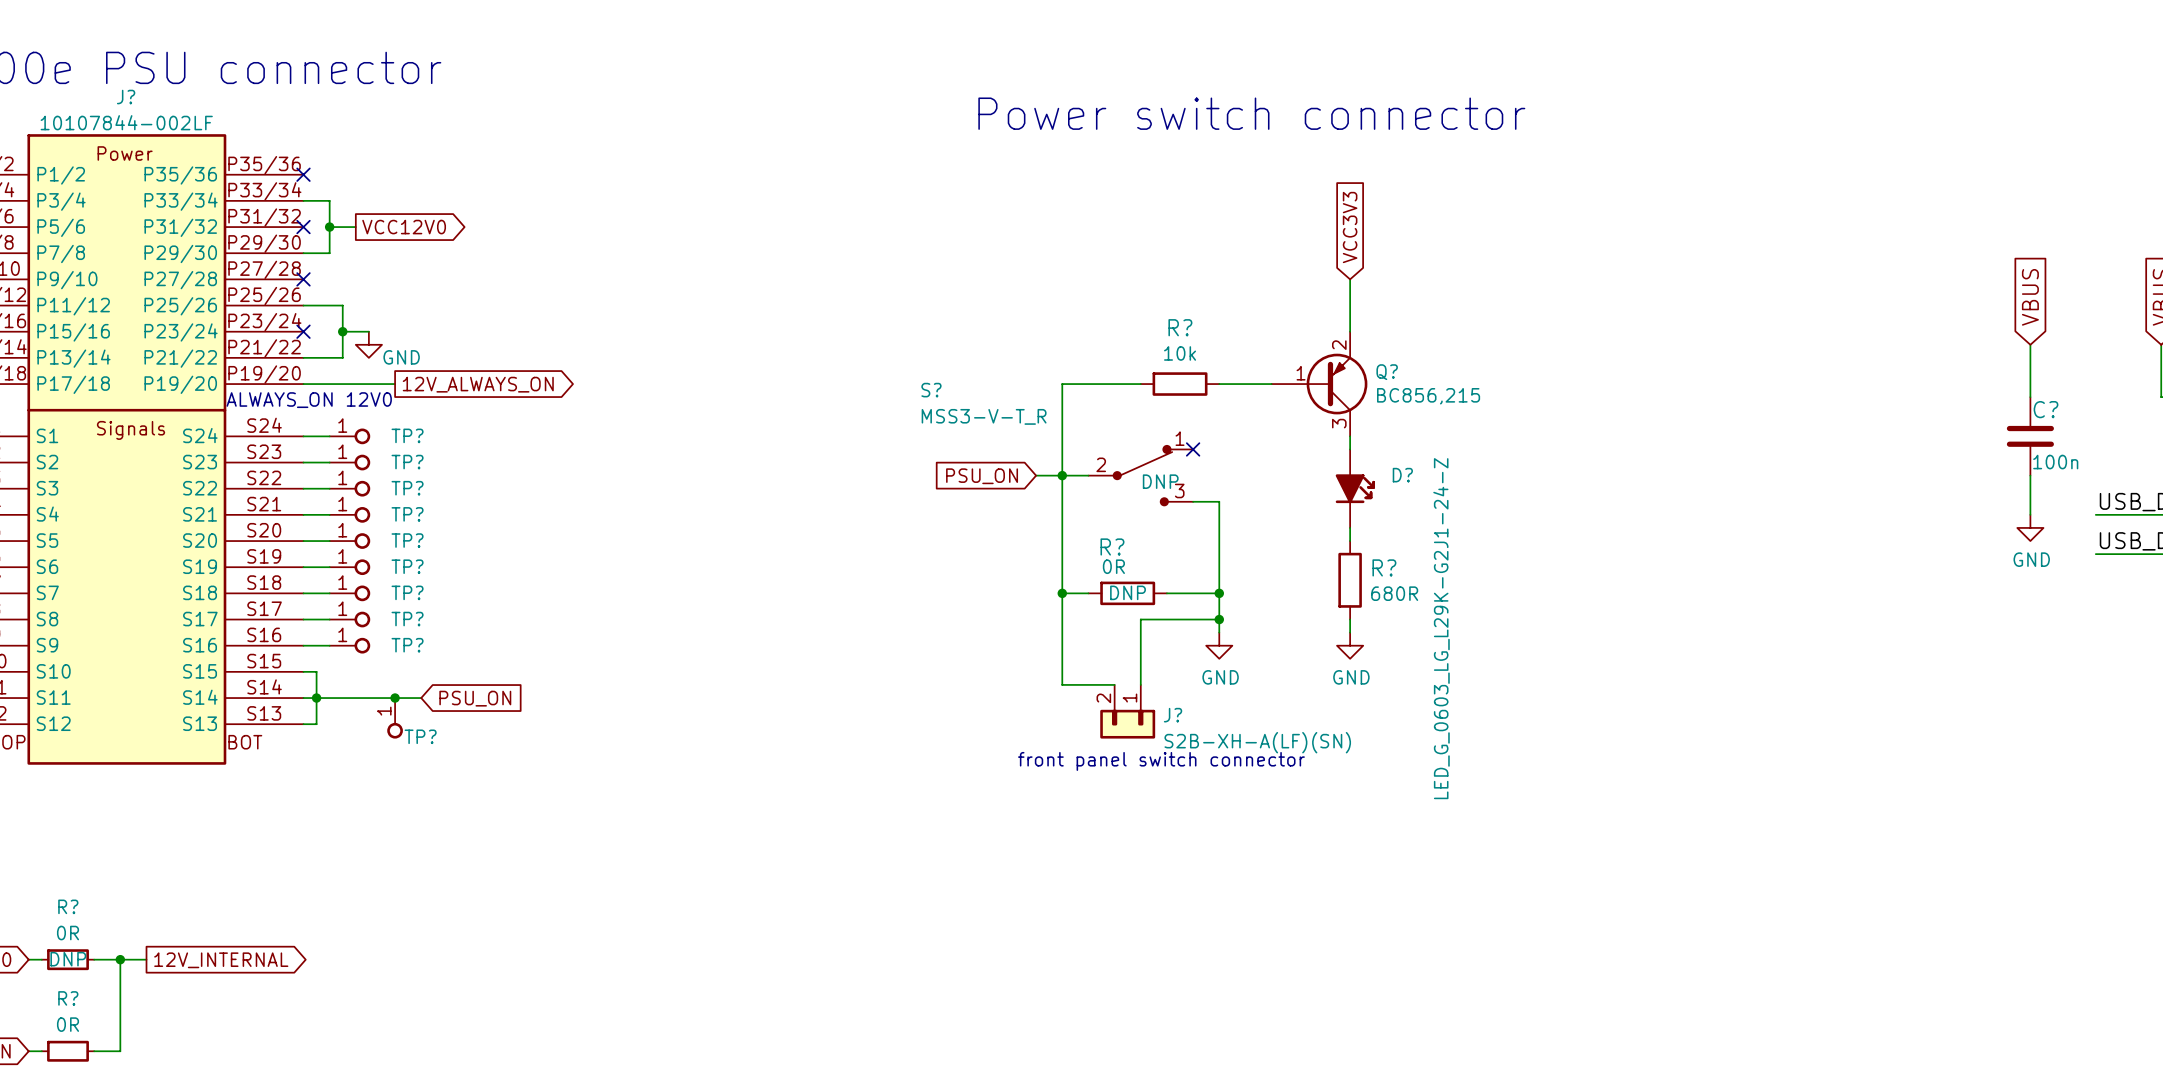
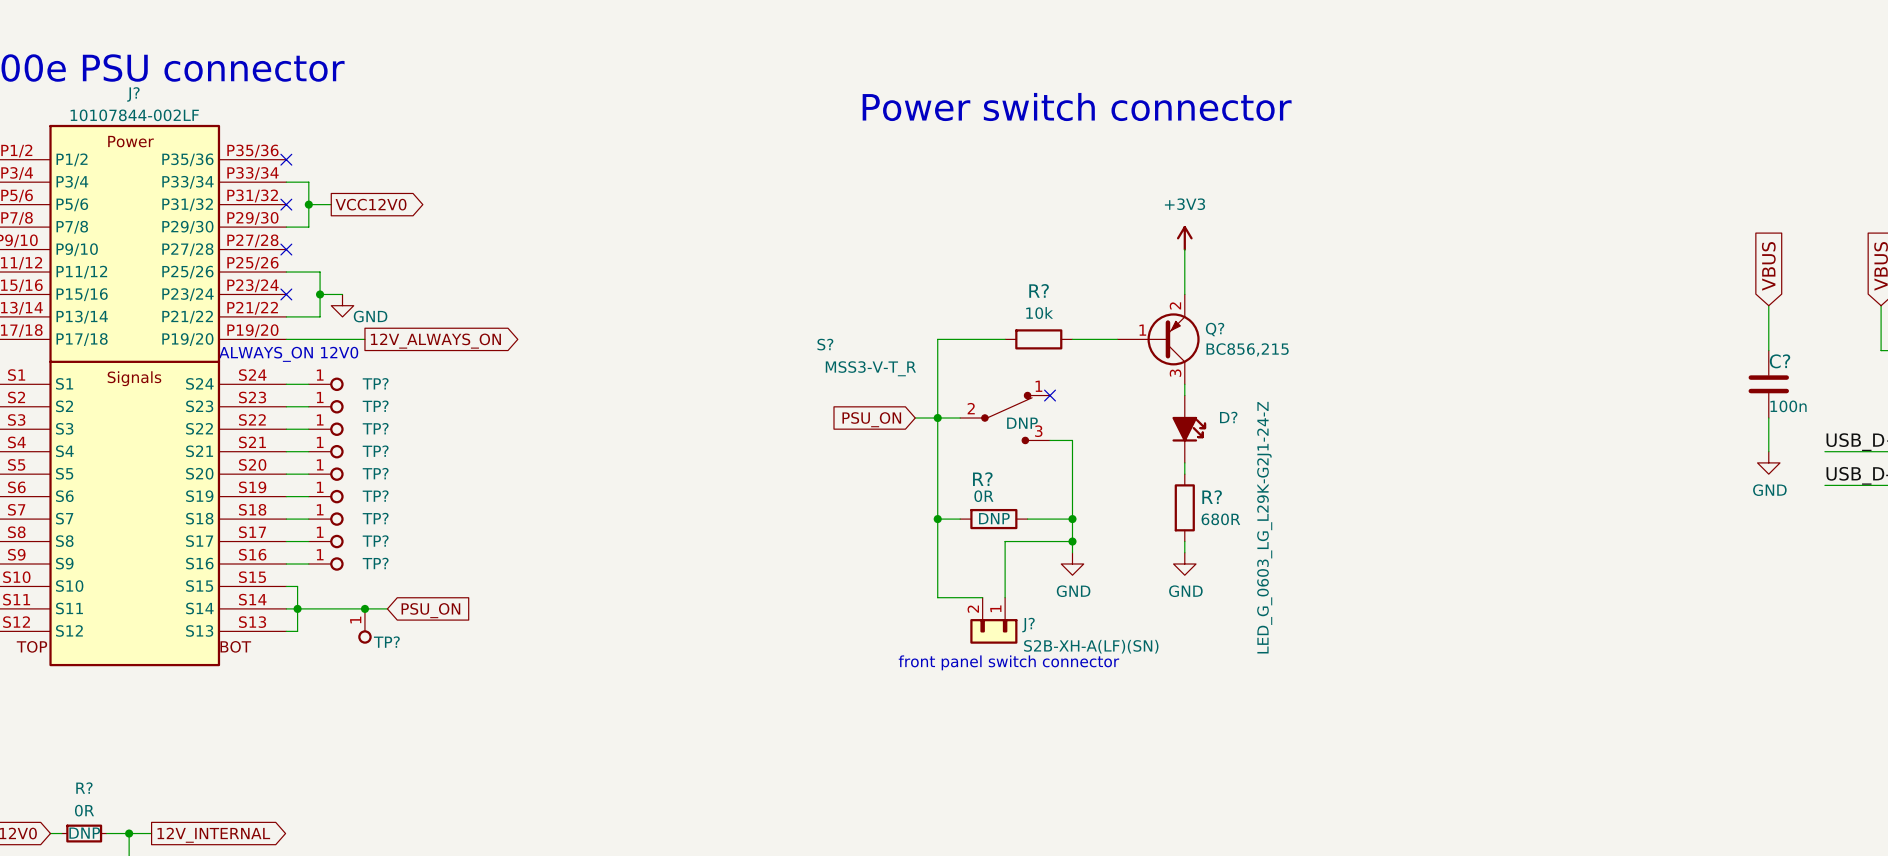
global label: VCC3V3 (1350, 227) -> none
power symbol: none -> +3V3 (1184, 238)

